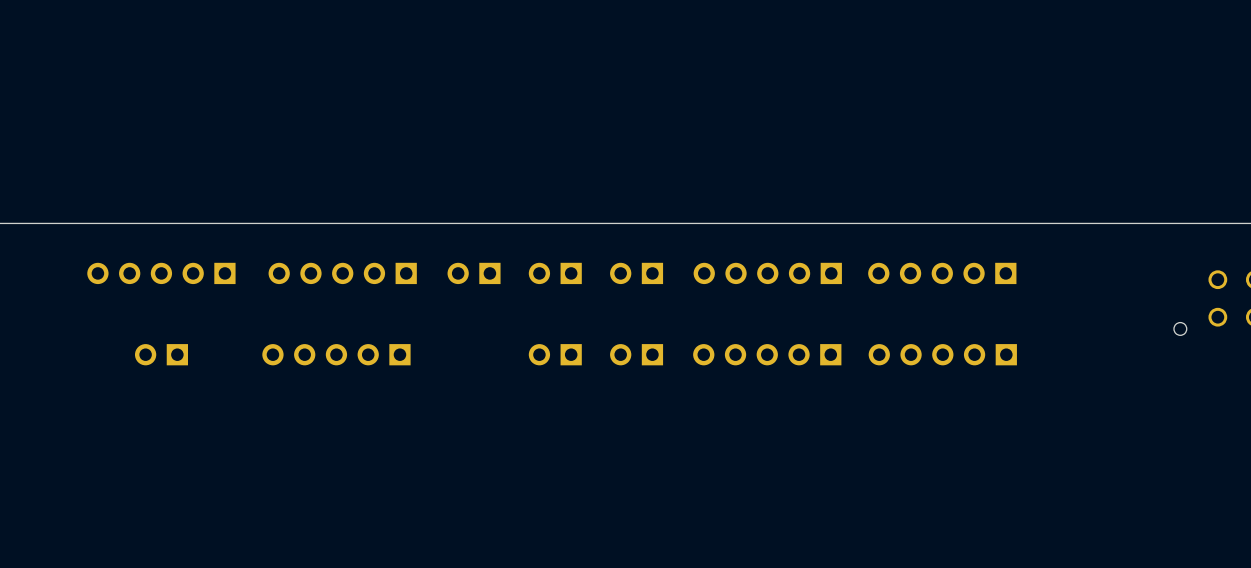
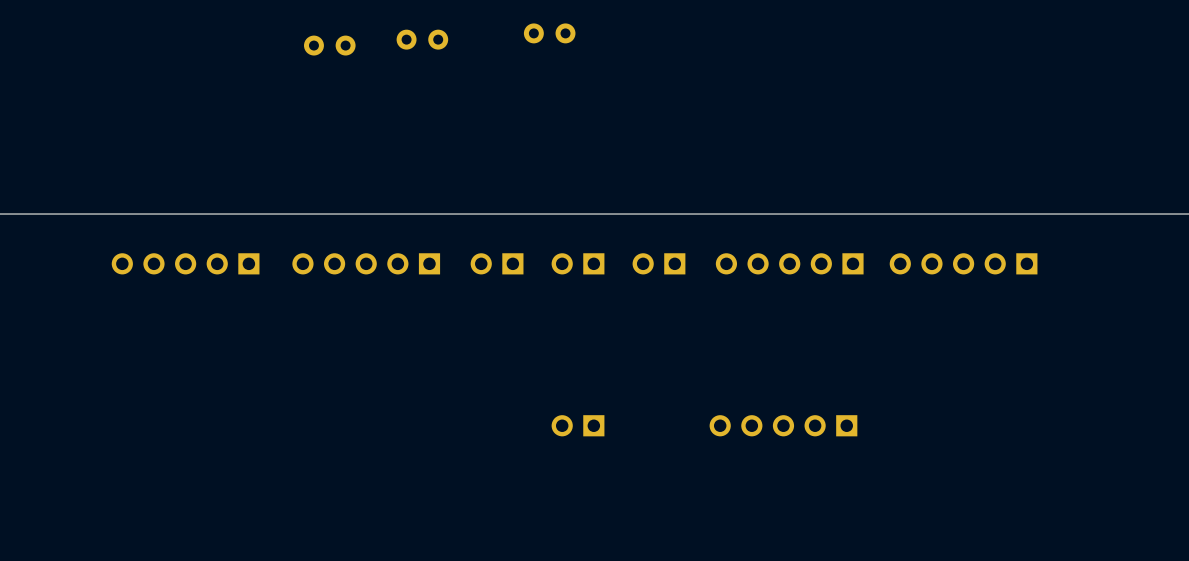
part: none -> (549, 33)
part: none -> (422, 39)
part: none -> (329, 45)
part: (161, 354) -> none
part: (336, 354) -> none
part: (555, 354) -> none
part: (636, 354) -> none
part position: (767, 354) -> (783, 425)
part: (942, 354) -> none
part: none -> (578, 425)

